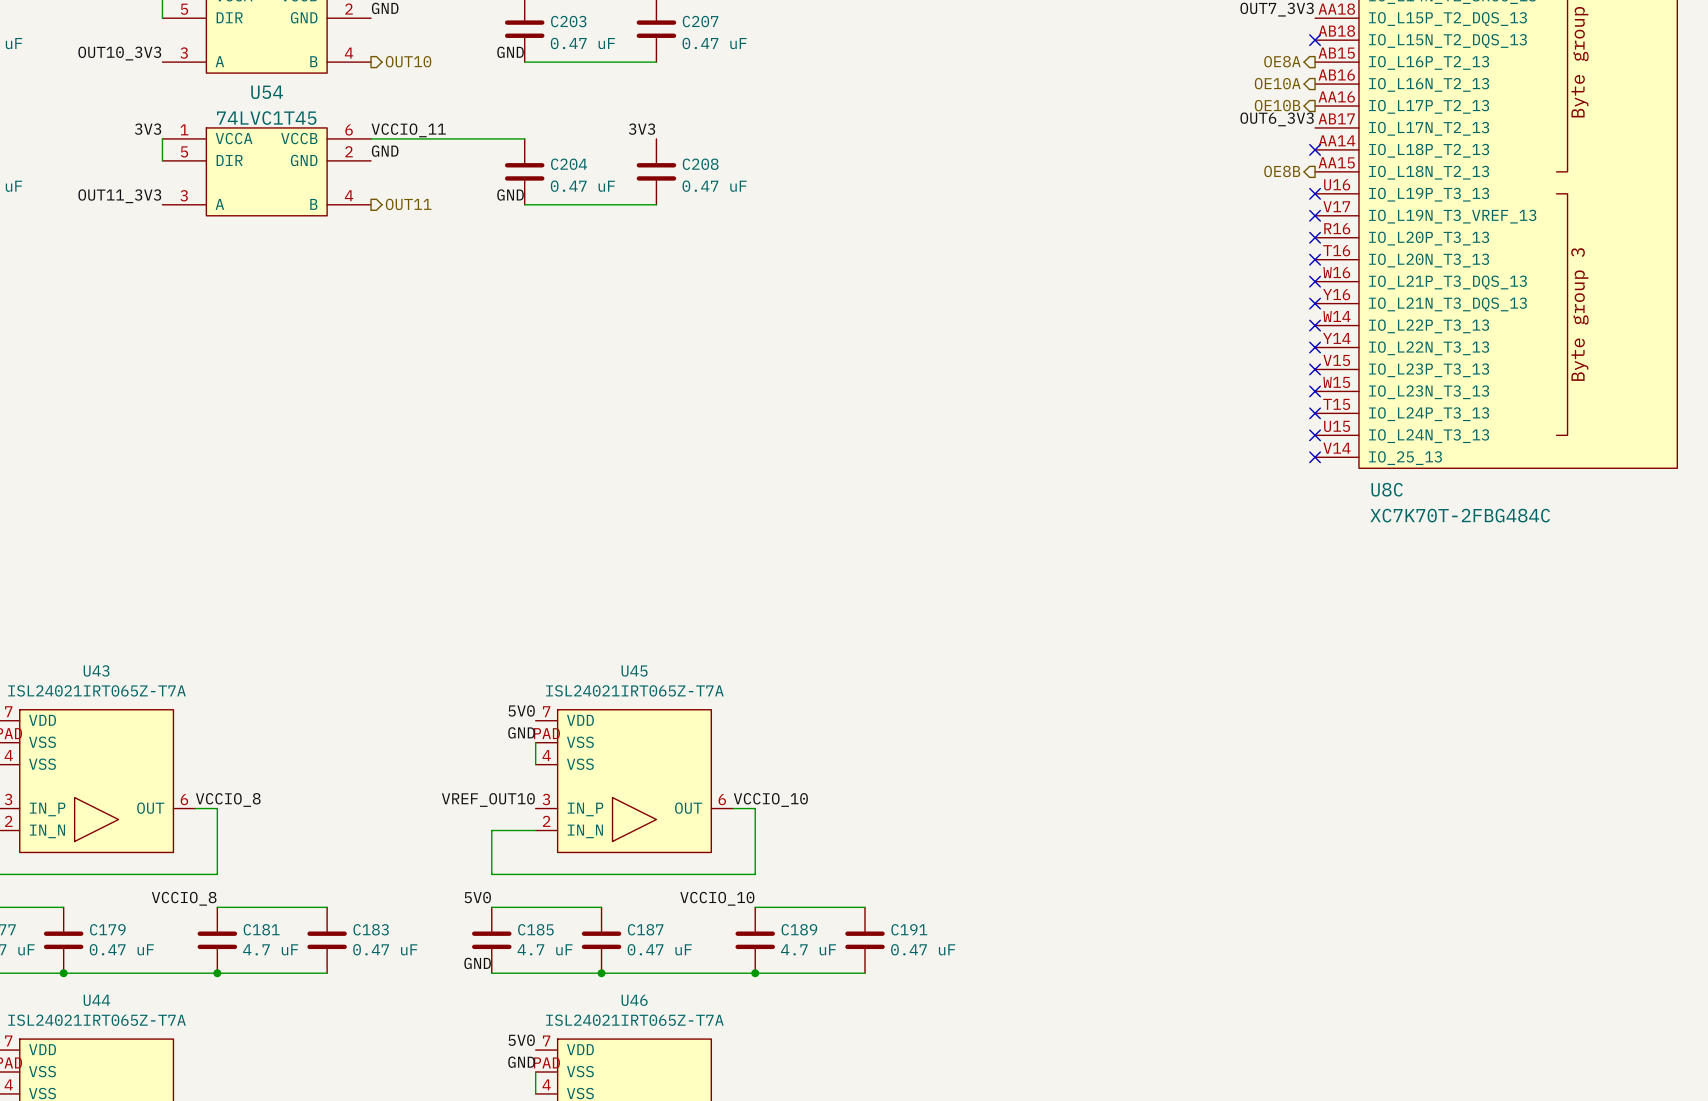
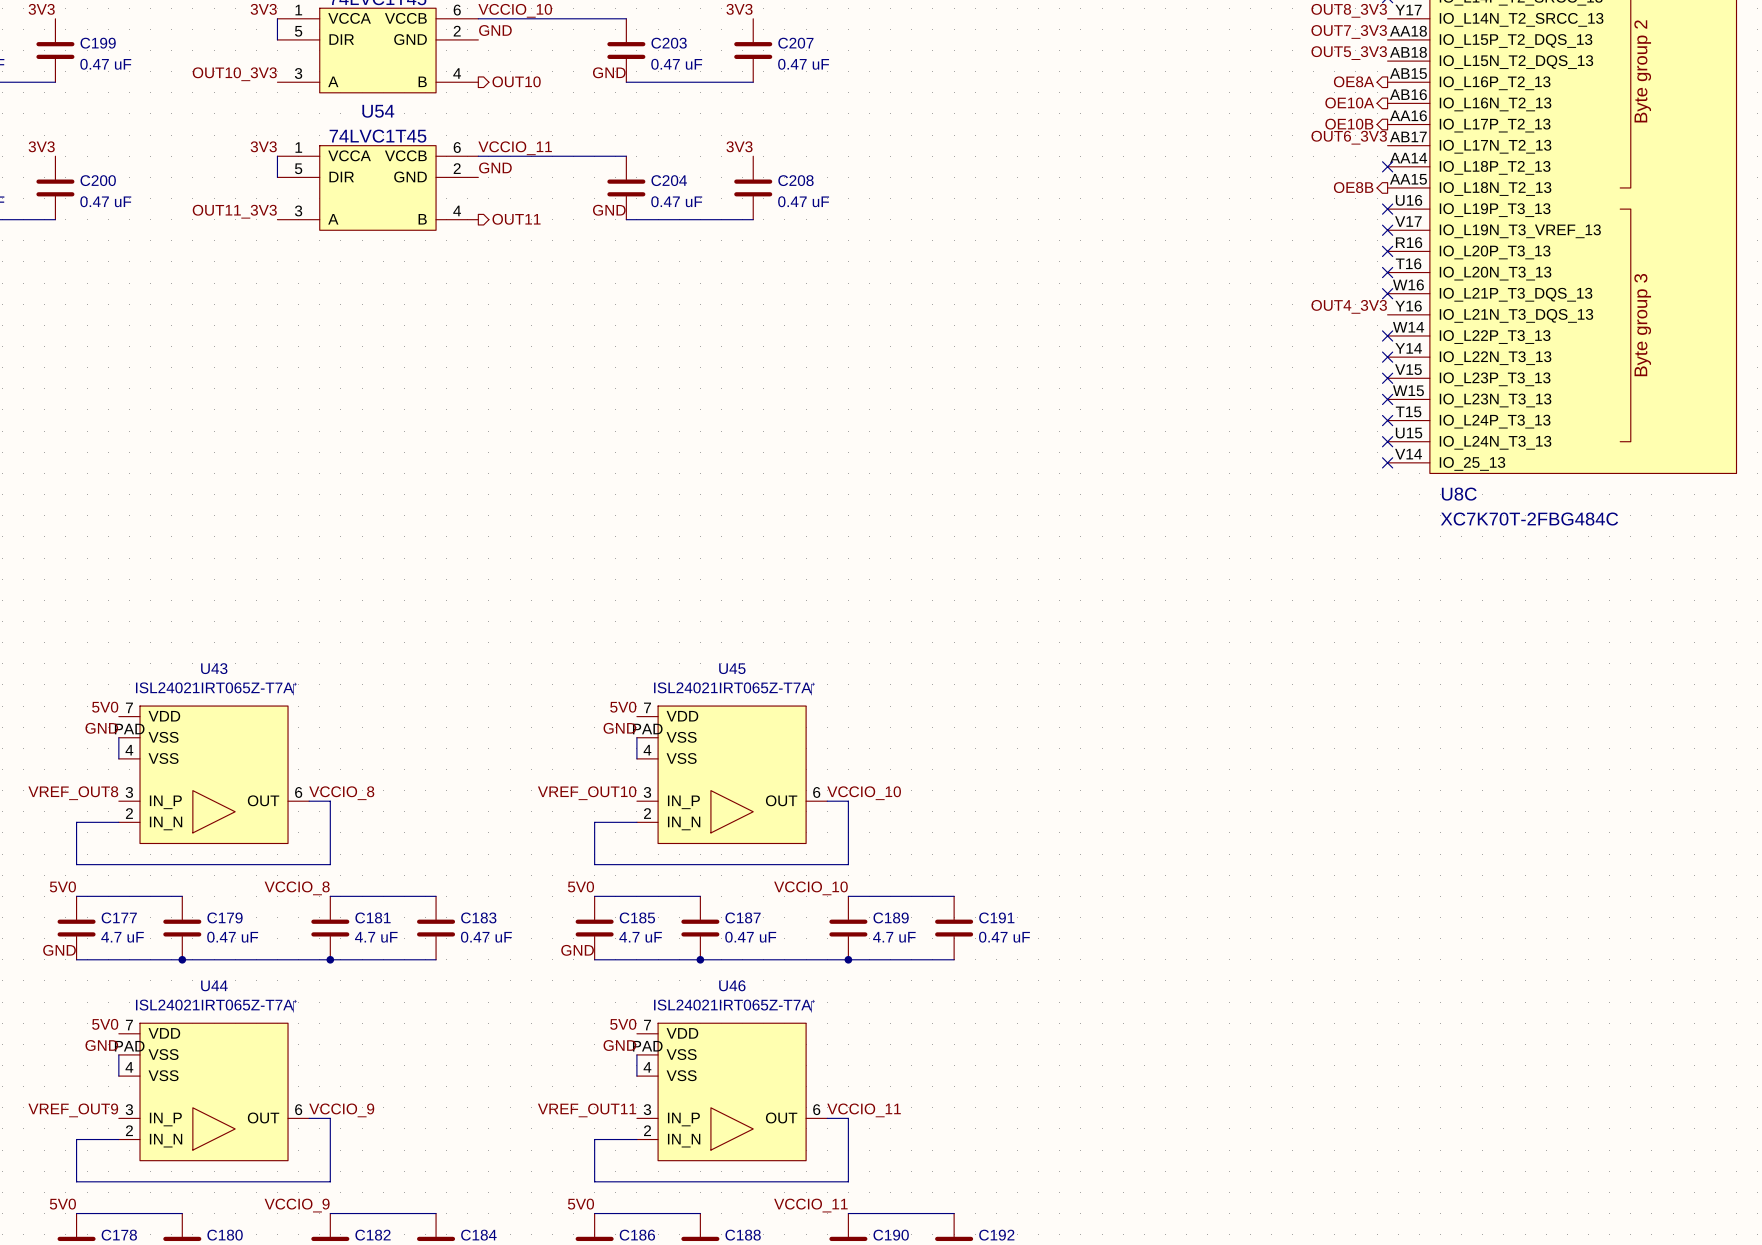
label: none -> OUT5_3V3 (1349, 53)
no-connect mark: (1315, 40) -> none
label: none -> OUT4_3V3 (1349, 306)
no-connect mark: (1315, 303) -> none

